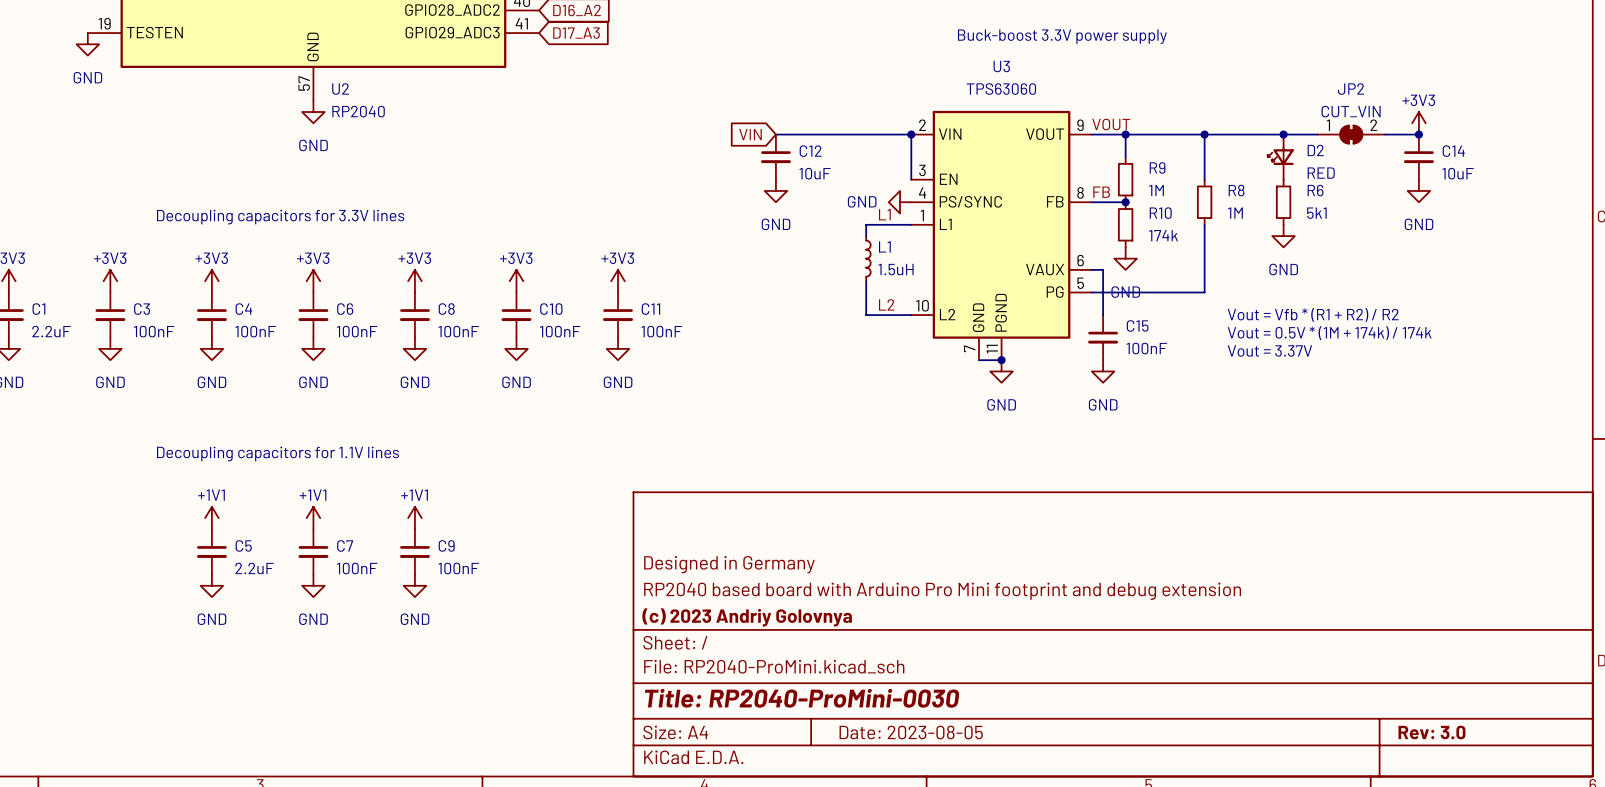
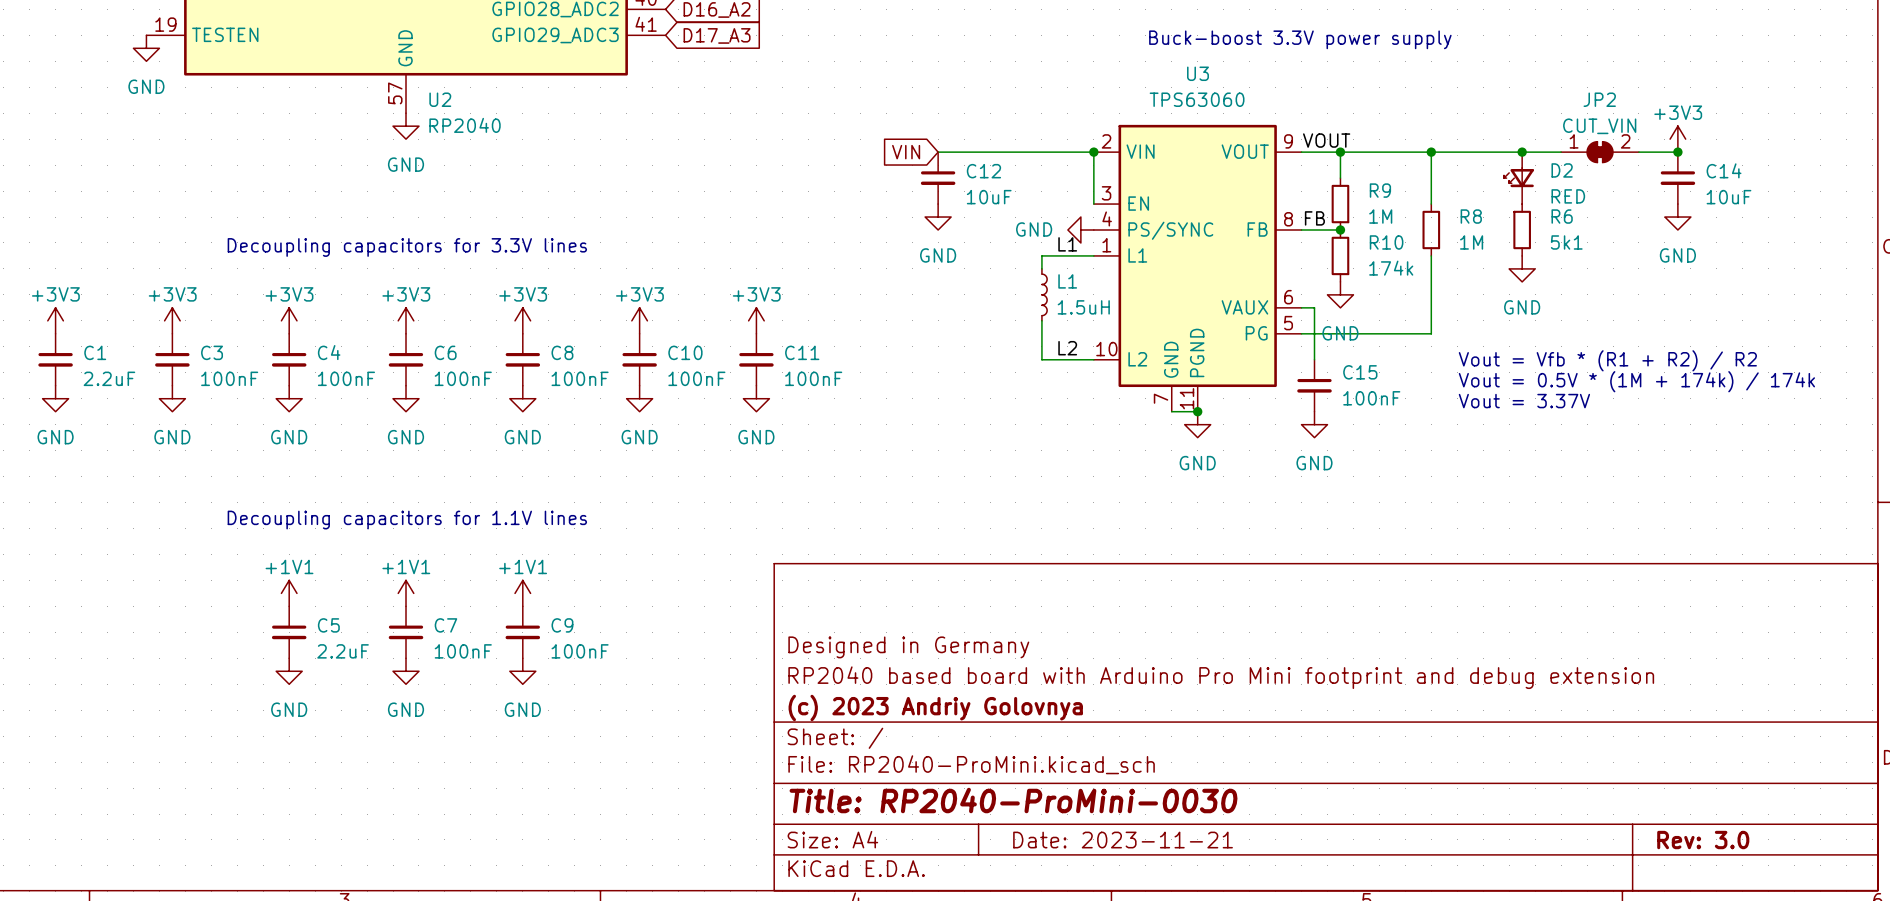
title block: Date: 2023-08-05 (911, 732) -> Date: 2023-11-21 (1123, 840)

